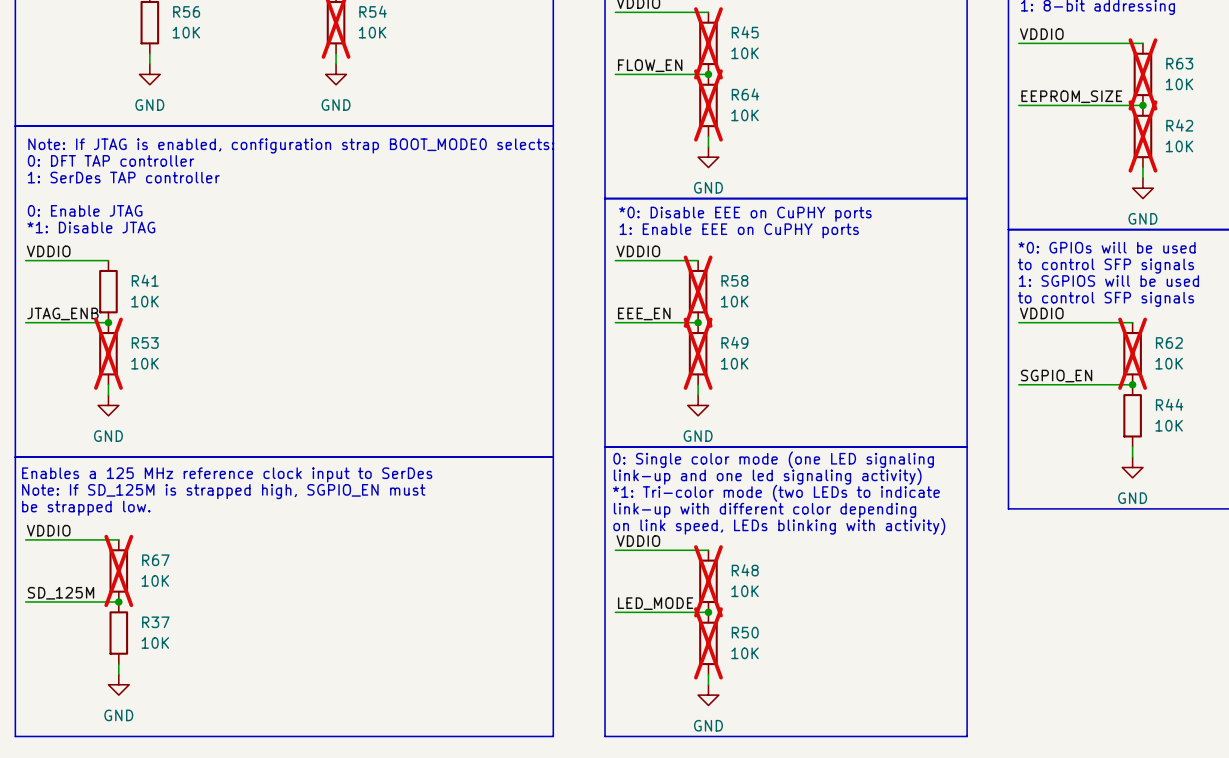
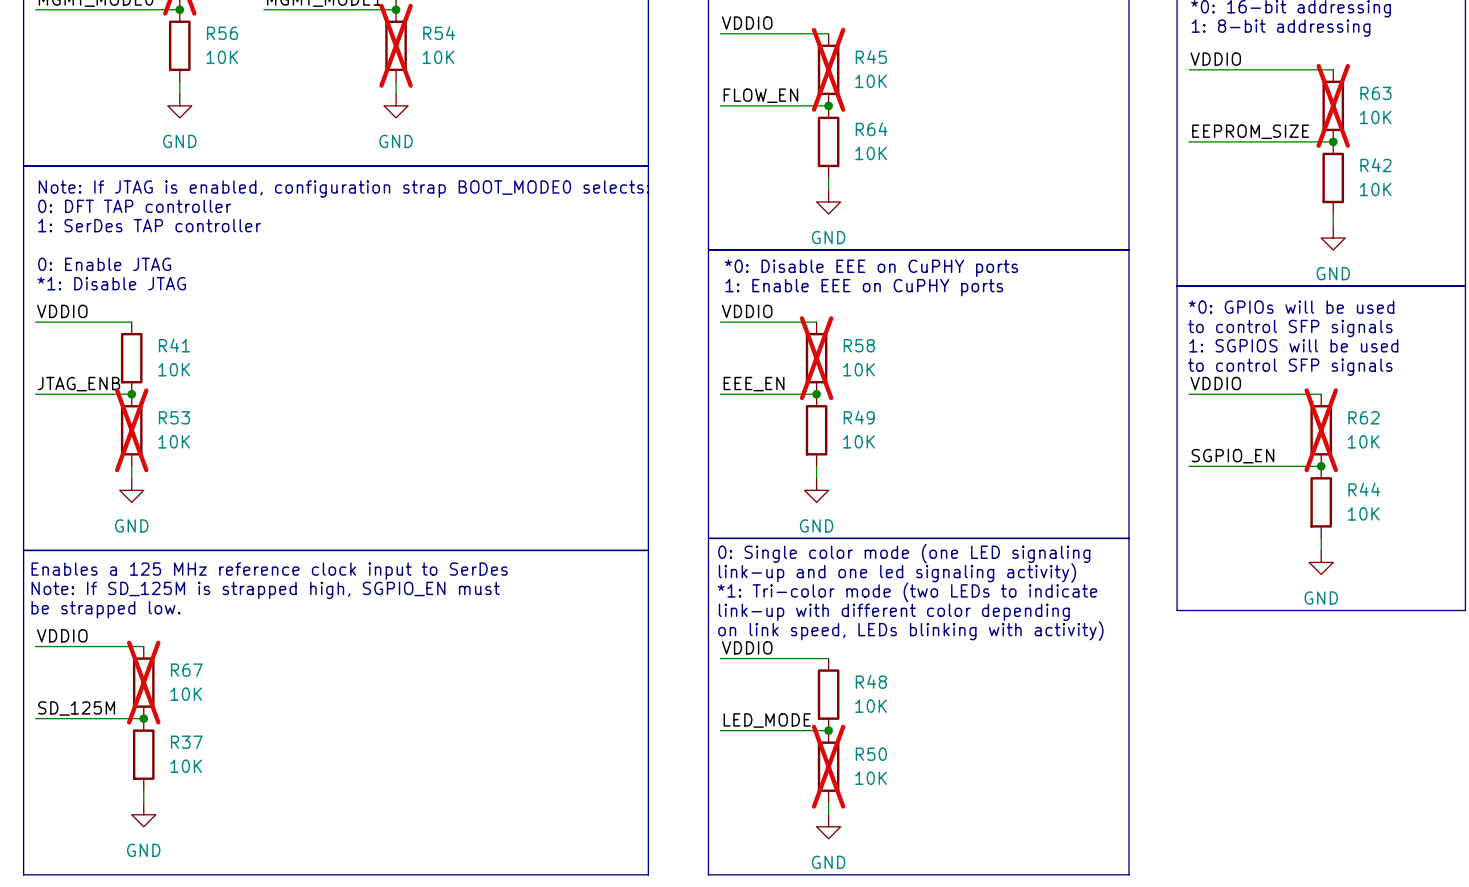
R64 do-not-place cross: (708, 105) -> none
R42 do-not-place cross: (1142, 136) -> none
R49 do-not-place cross: (698, 353) -> none
R48 do-not-place cross: (708, 581) -> none

